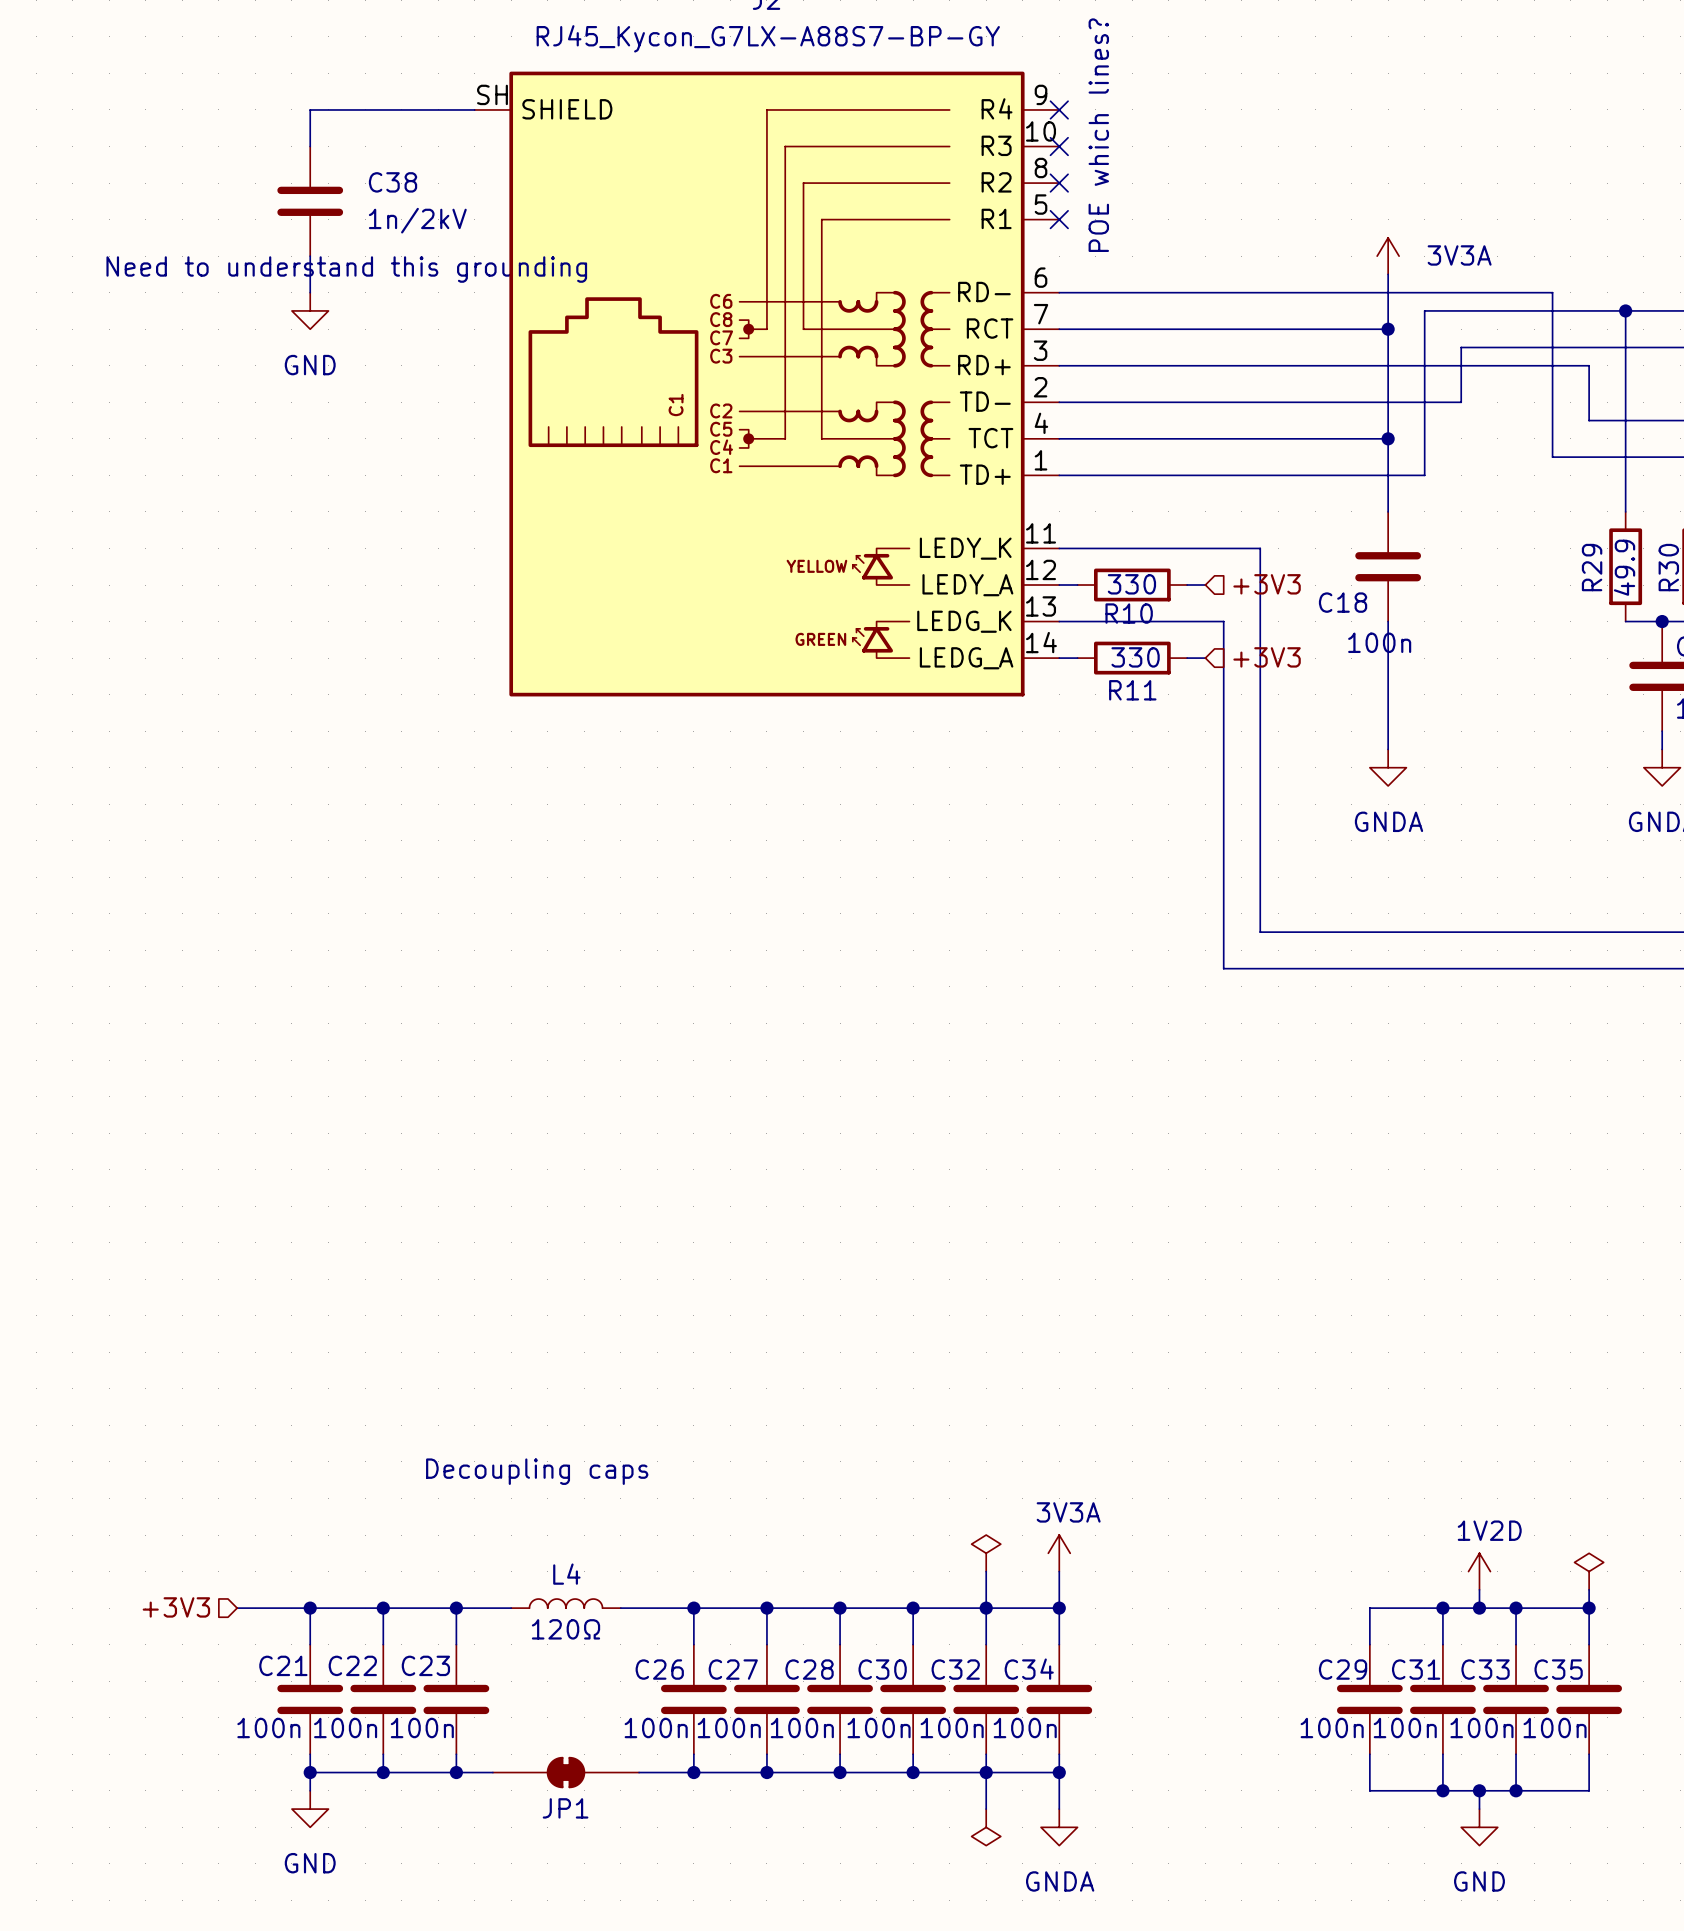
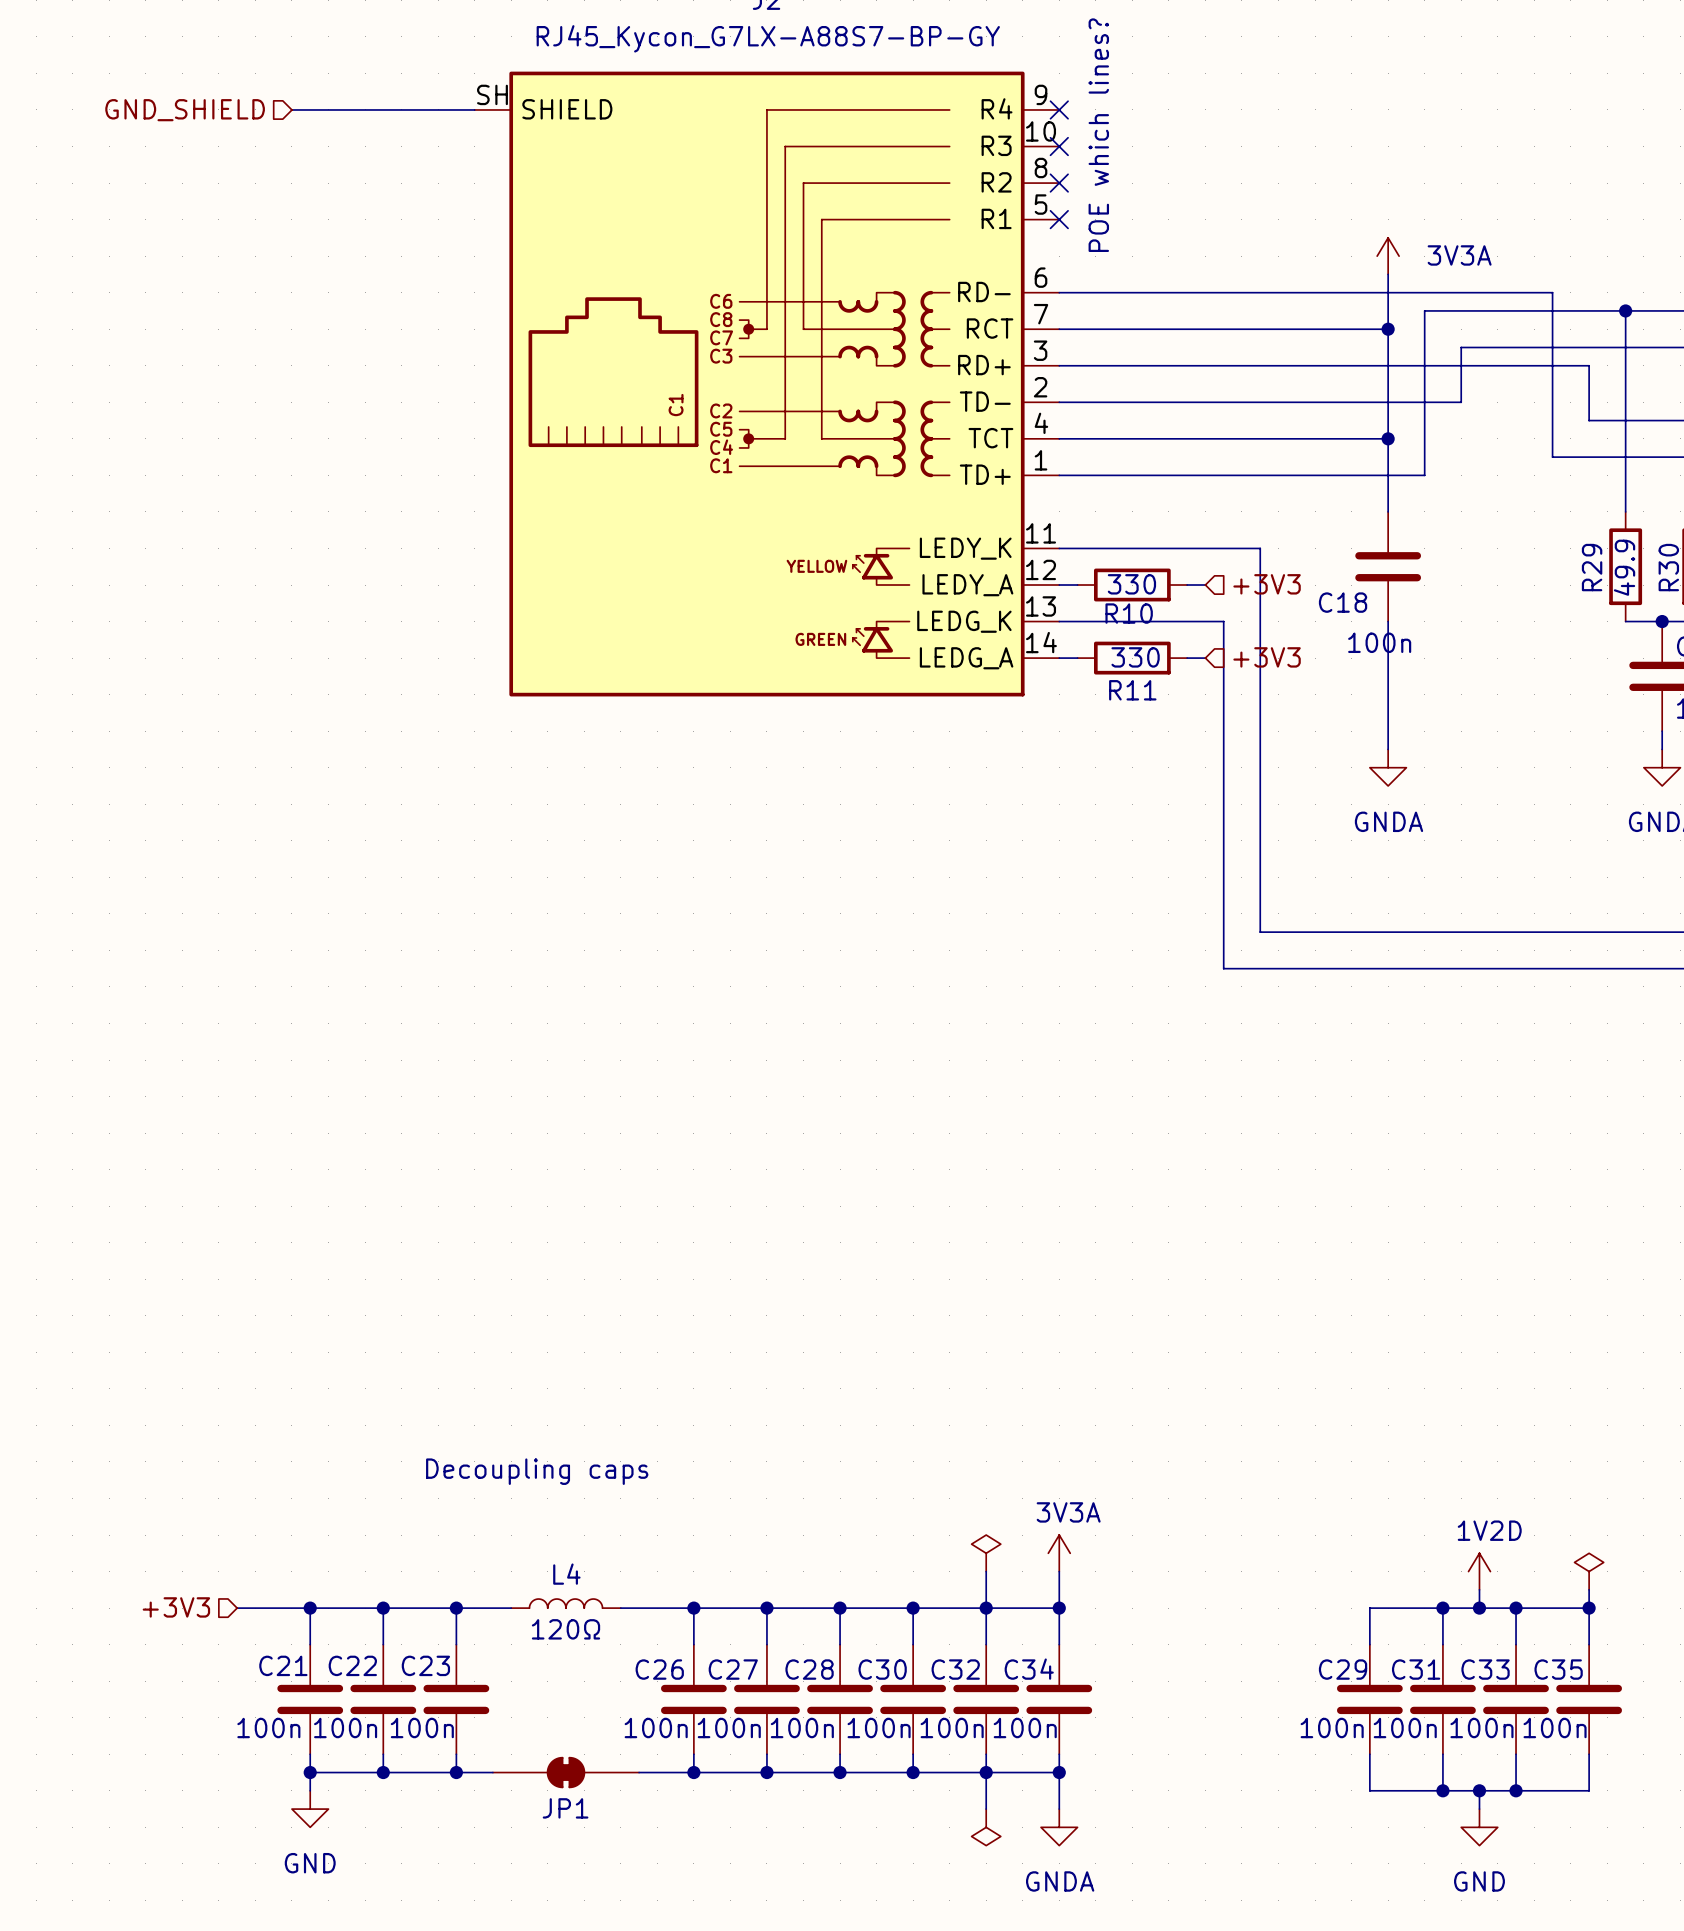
wire: (310, 109) (310, 146) -> (310, 109) (291, 109)
hierarchical label: none -> GND_SHIELD (185, 110)
C38: 1n/2kV (310, 201) -> none
wire: (310, 256) (310, 292) -> none
text: Need to understand this grounding (346, 269) -> none
power symbol: GND (310, 310) -> none

